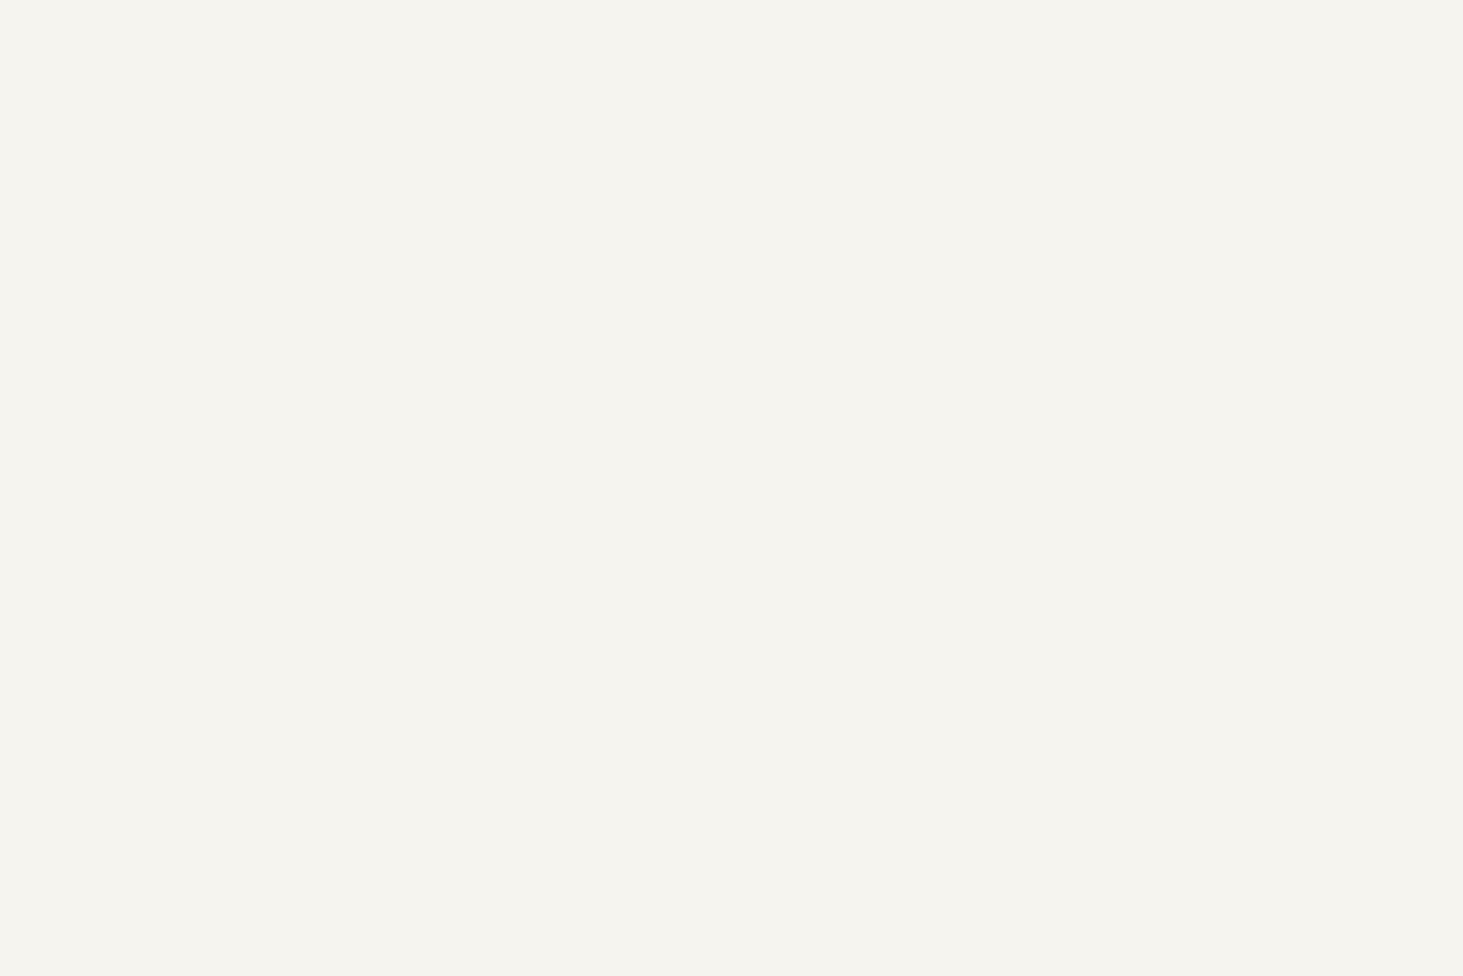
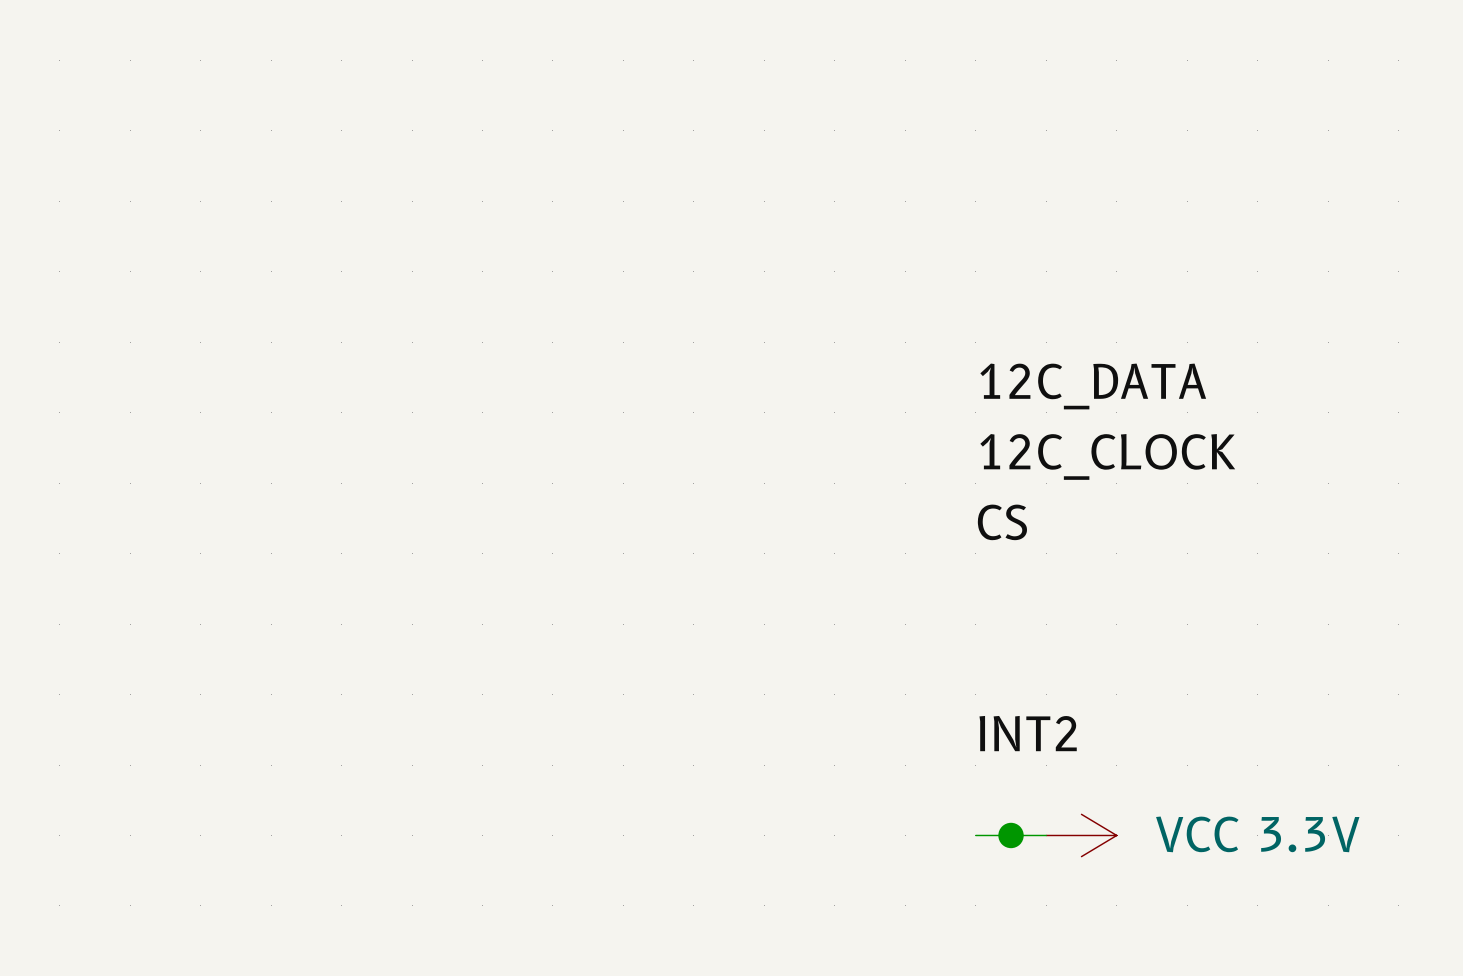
label: none -> 12C_DATA (1093, 386)
label: none -> 12C_CLOCK (1107, 456)
label: none -> CS (1002, 522)
label: none -> INT2 (1028, 733)
wire: none -> (975, 835) (1046, 835)
junction: none -> (1011, 835)
power symbol: none -> VCC 3.3V (1081, 835)

